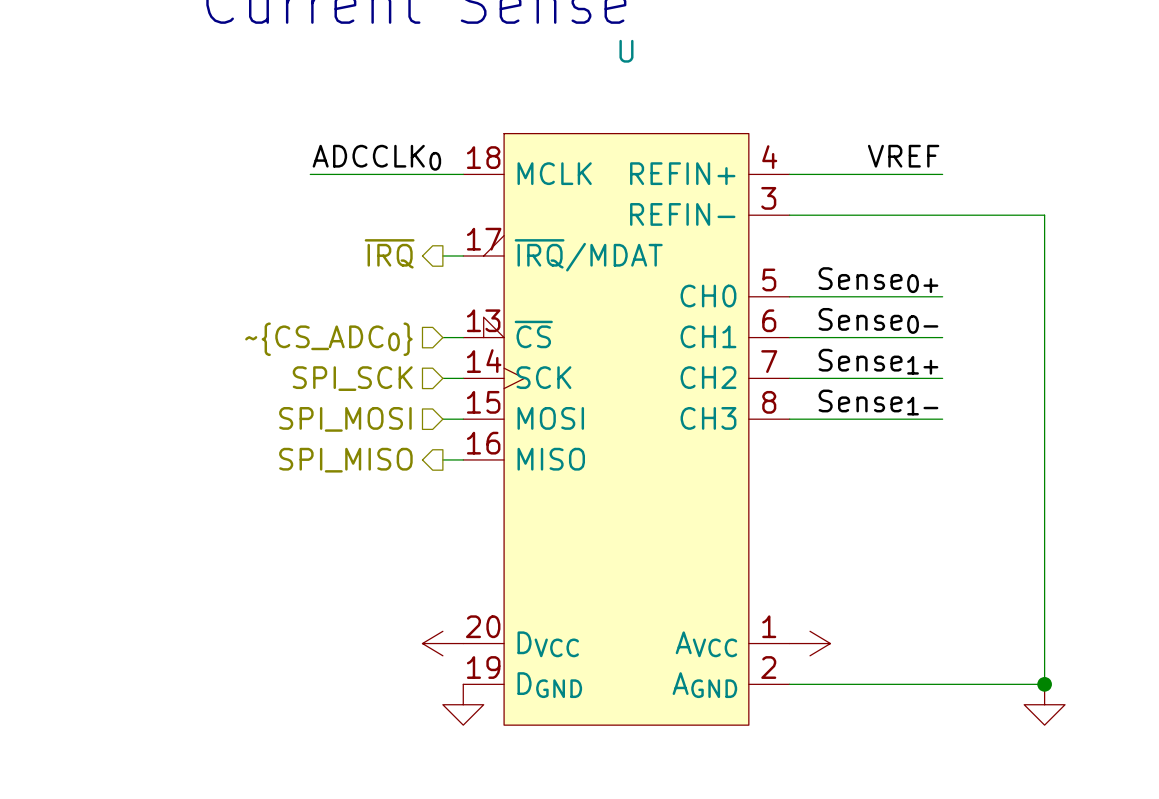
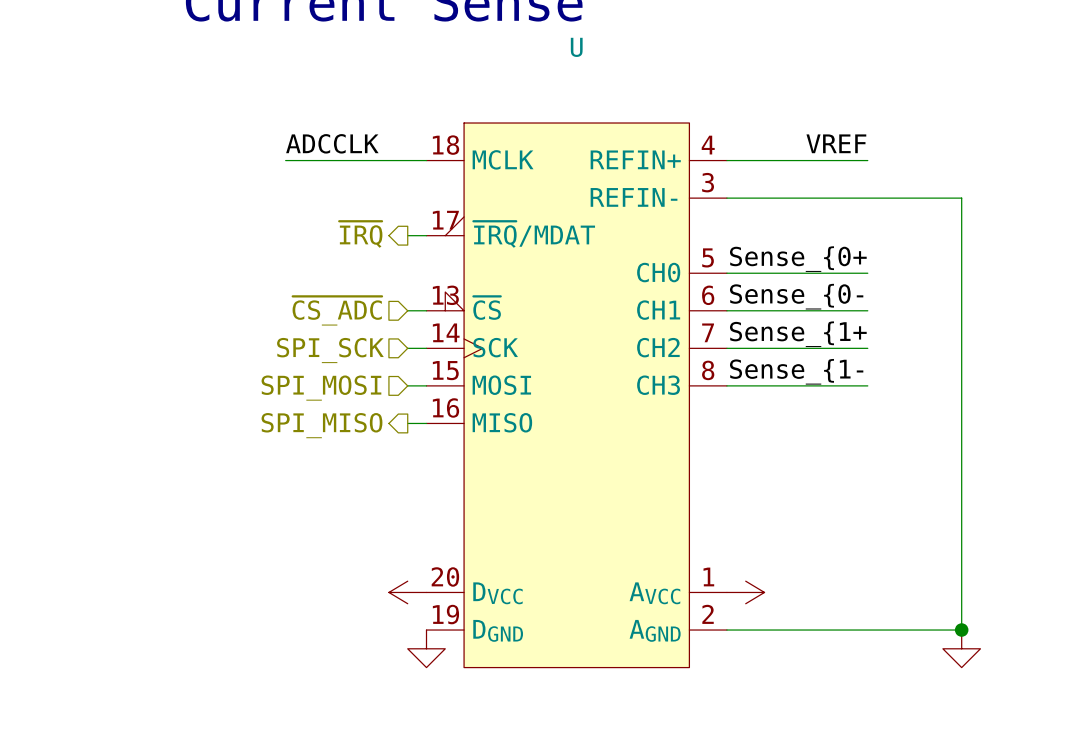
label: ADCCLK0 (376, 157) -> ADCCLK (332, 143)
label: Sense0+ (878, 280) -> Sense_{0+ (798, 259)
label: Sense0- (878, 320) -> Sense_{0- (796, 296)
hierarchical label: ~{CS_ADC0} (328, 339) -> ~{CS_ADC} (337, 310)
label: Sense1+ (878, 361) -> Sense_{1+ (798, 334)
label: Sense1- (878, 402) -> Sense_{1- (796, 371)

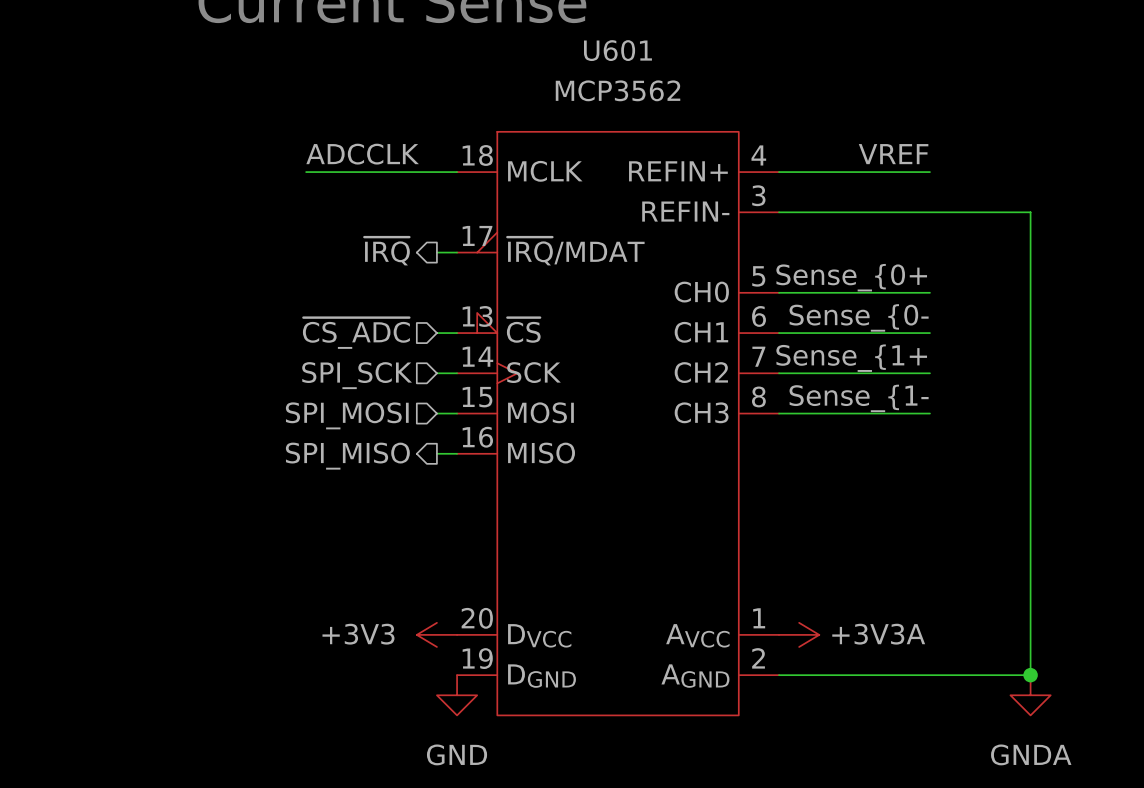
U name: U (576, 47) -> U601 (617, 50)
U value: none -> MCP3562 (618, 90)
power symbol text: none -> +3V3 (358, 634)
power symbol text: none -> +3V3A (878, 634)
power symbol text: none -> GND (457, 754)
power symbol text: none -> GNDA (1031, 754)

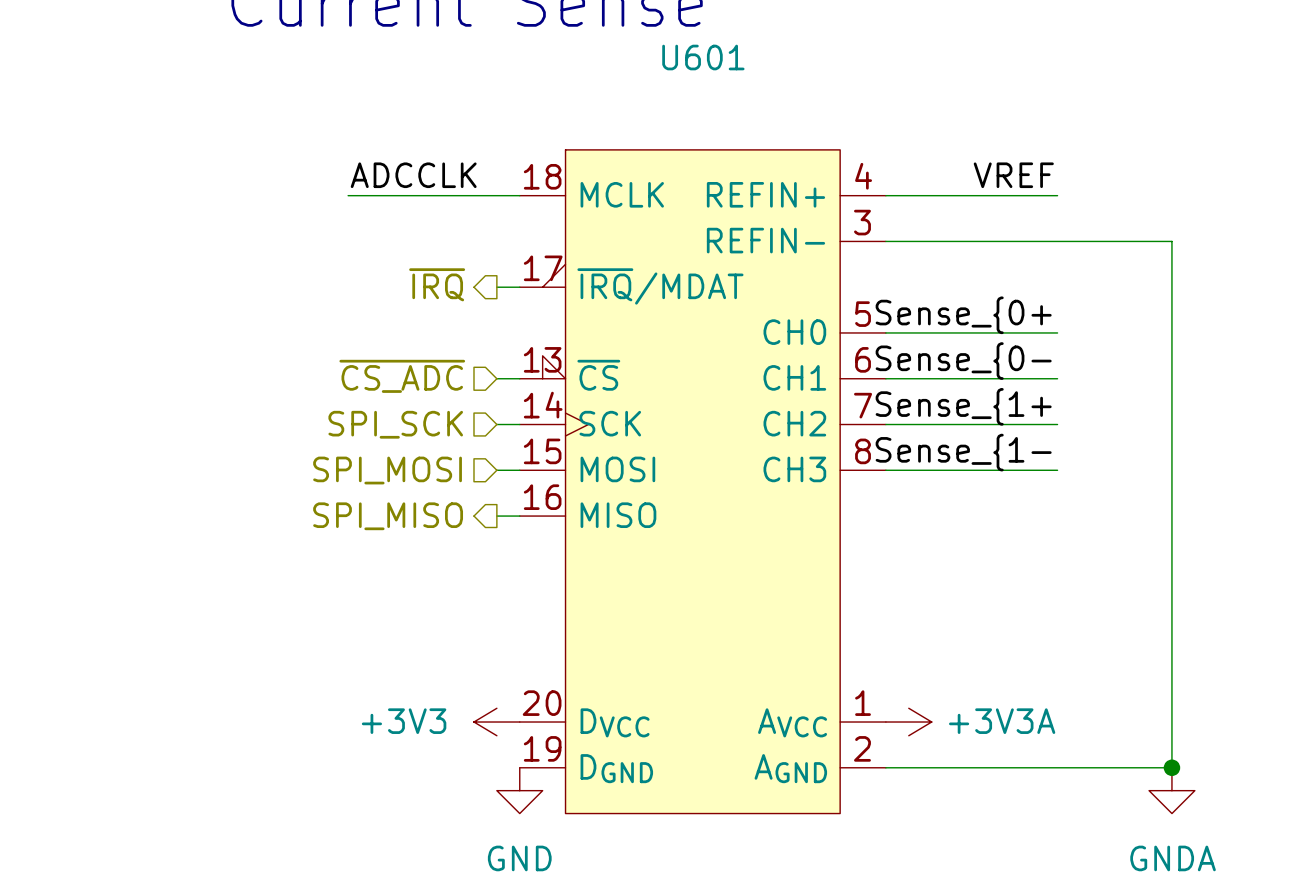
U601 value: MCP3562 (618, 90) -> none

